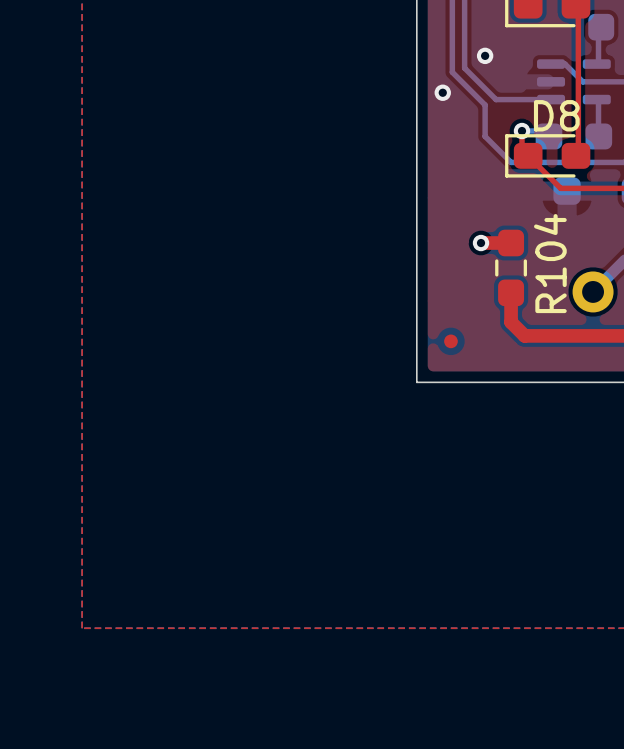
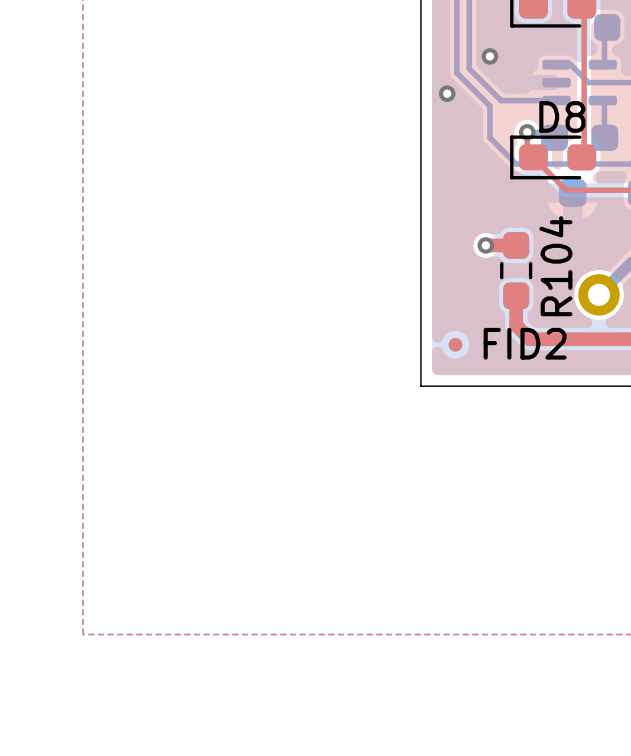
FID2 name: none -> FID2 (525, 343)

